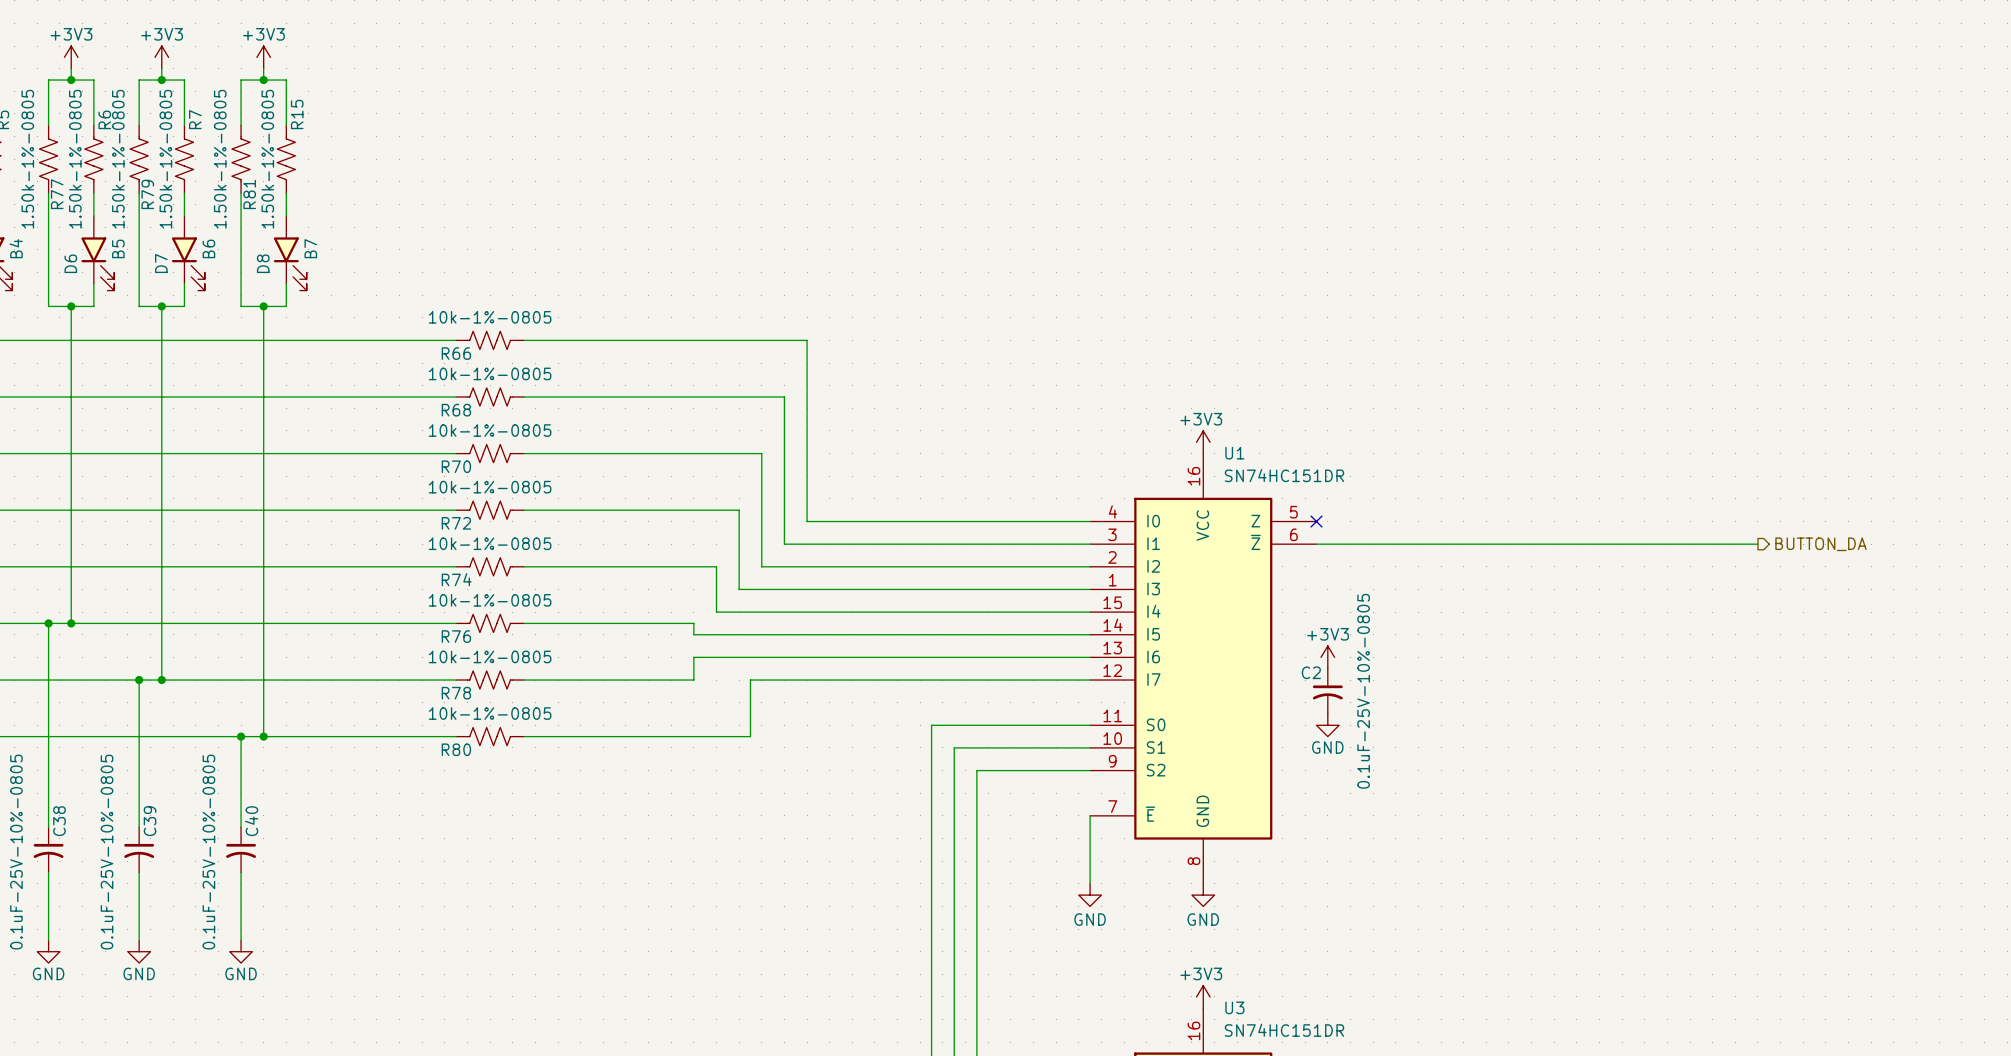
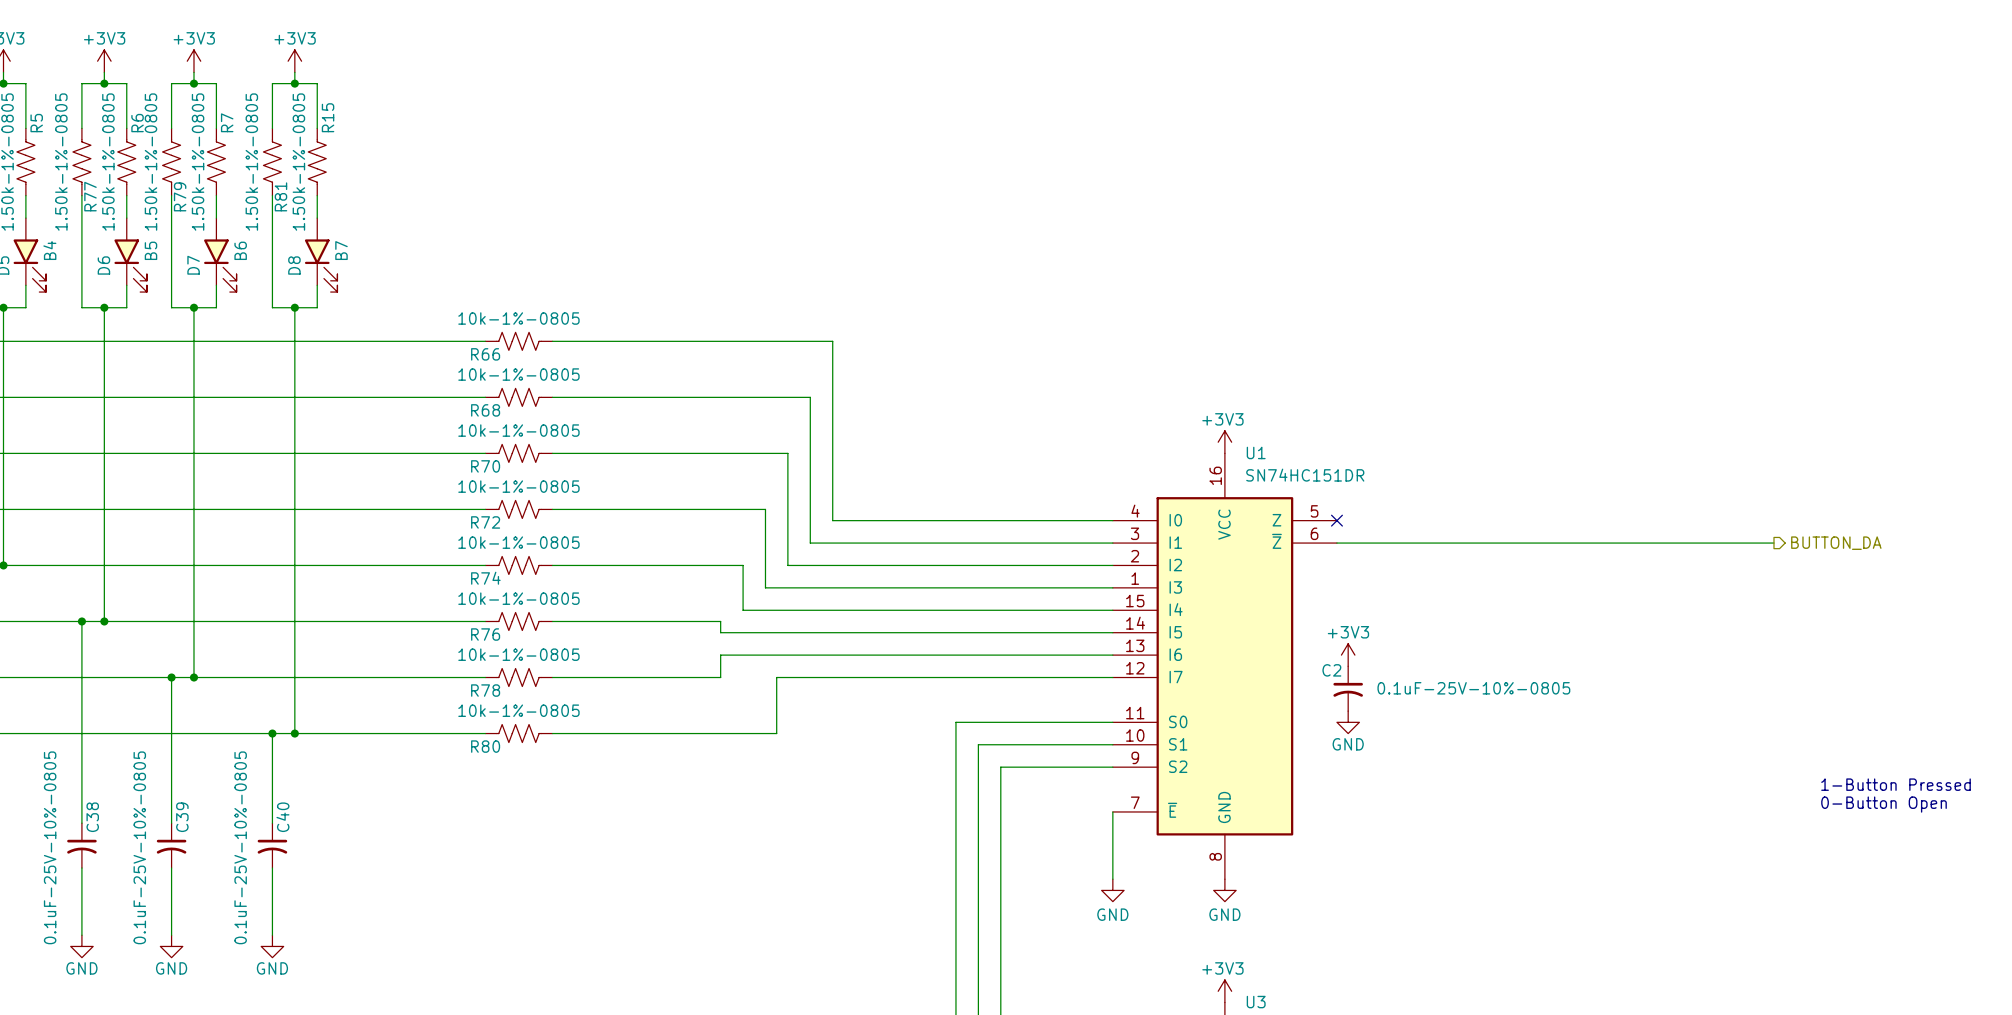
C2 value rotation: 0° (1363, 691) -> 90° clockwise (1473, 688)
text: none -> 1-Button Pressed (1896, 784)
text: none -> 0-Button Open (1884, 804)

